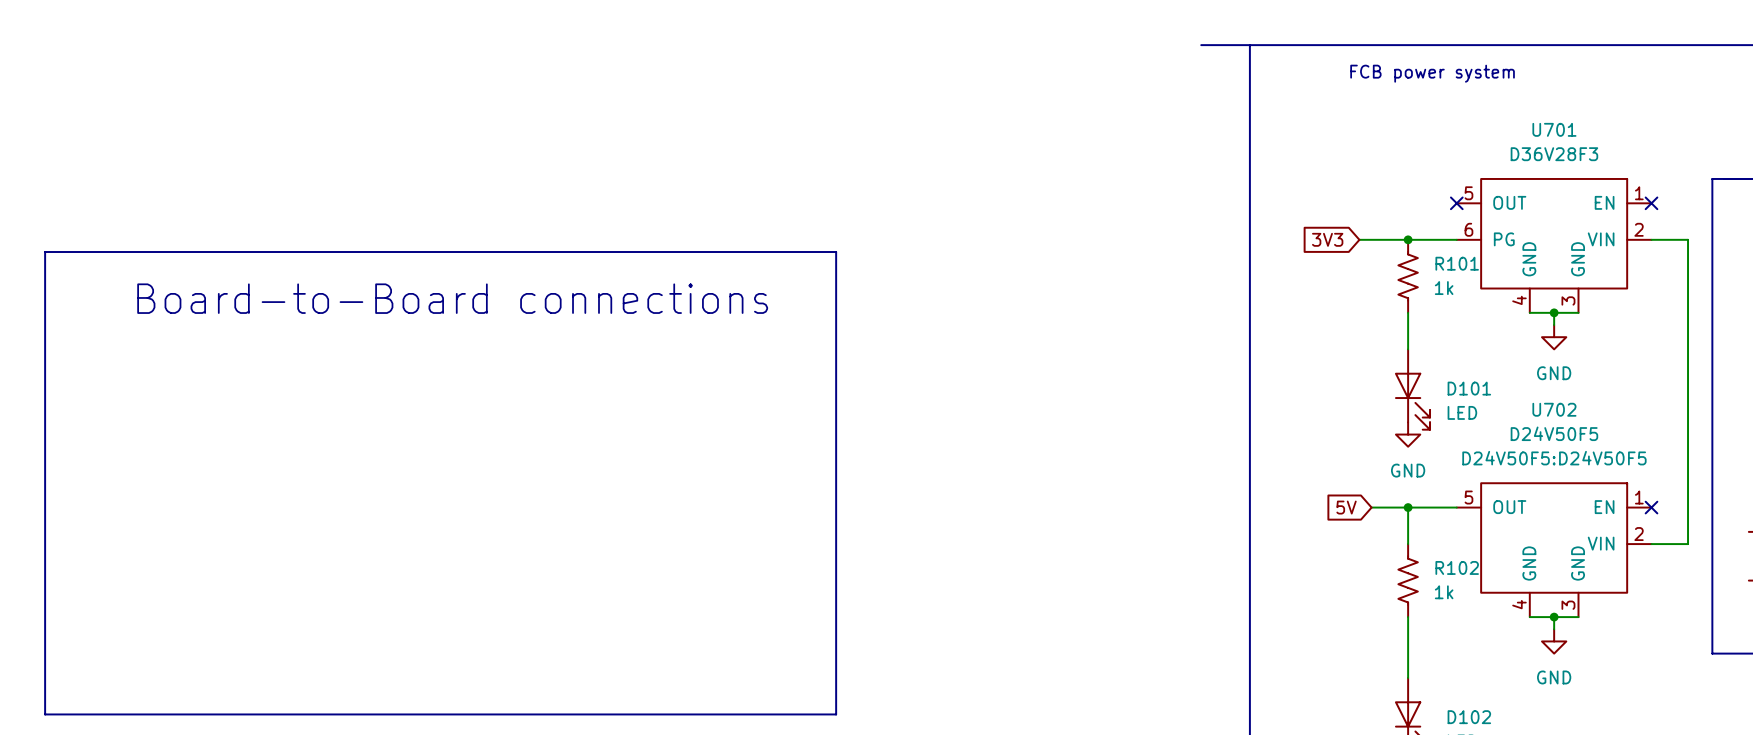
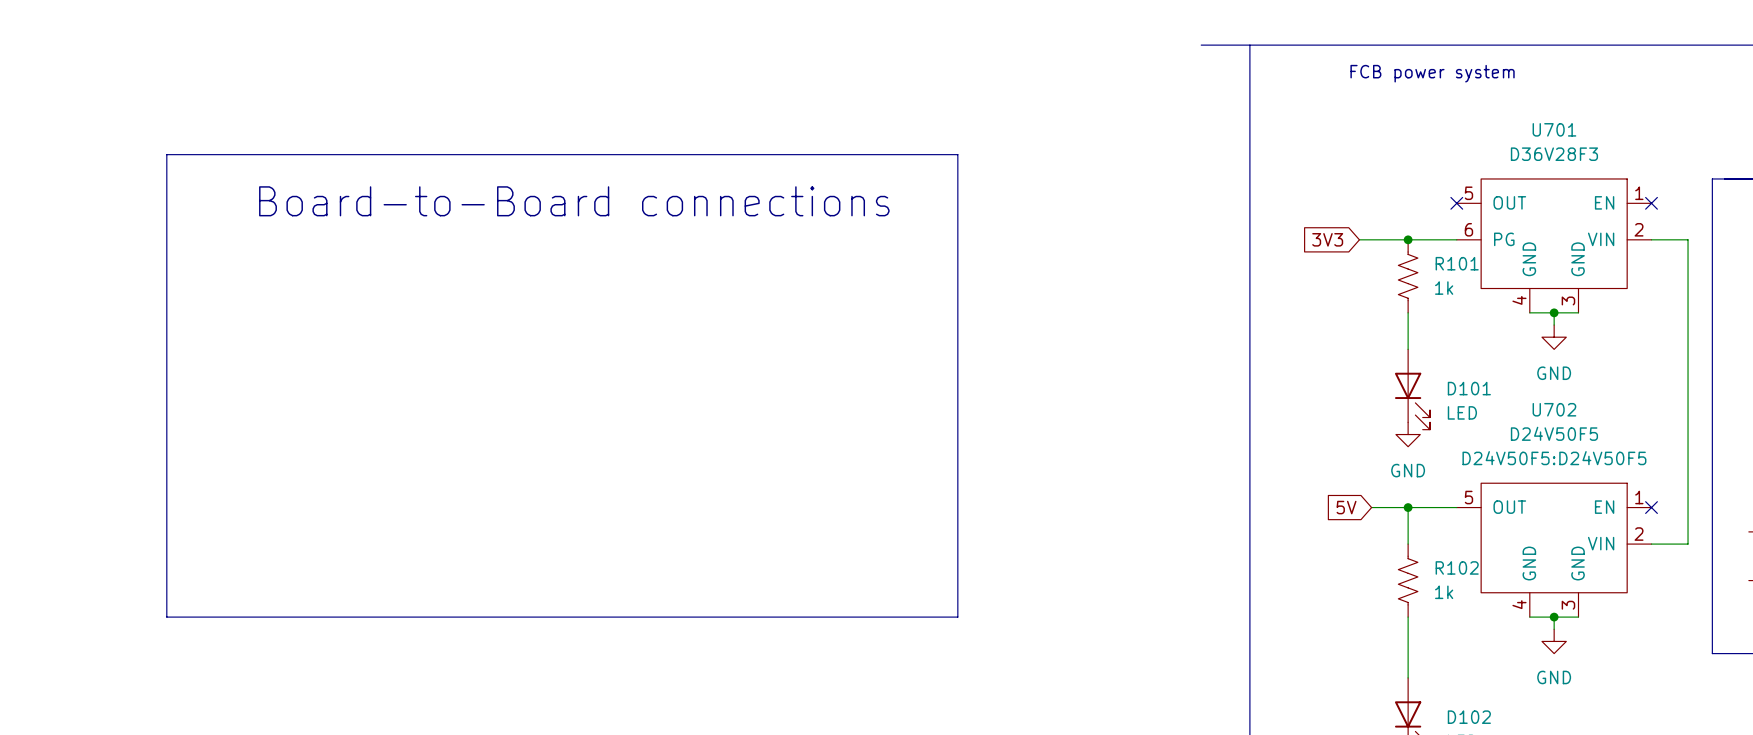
line: (45, 252) (45, 714) (836, 714) (836, 252) (45, 252) -> (166, 154) (166, 617) (957, 617) (957, 154) (166, 154)
text position: Board-to-Board connections (452, 298) -> Board-to-Board connections (574, 201)

